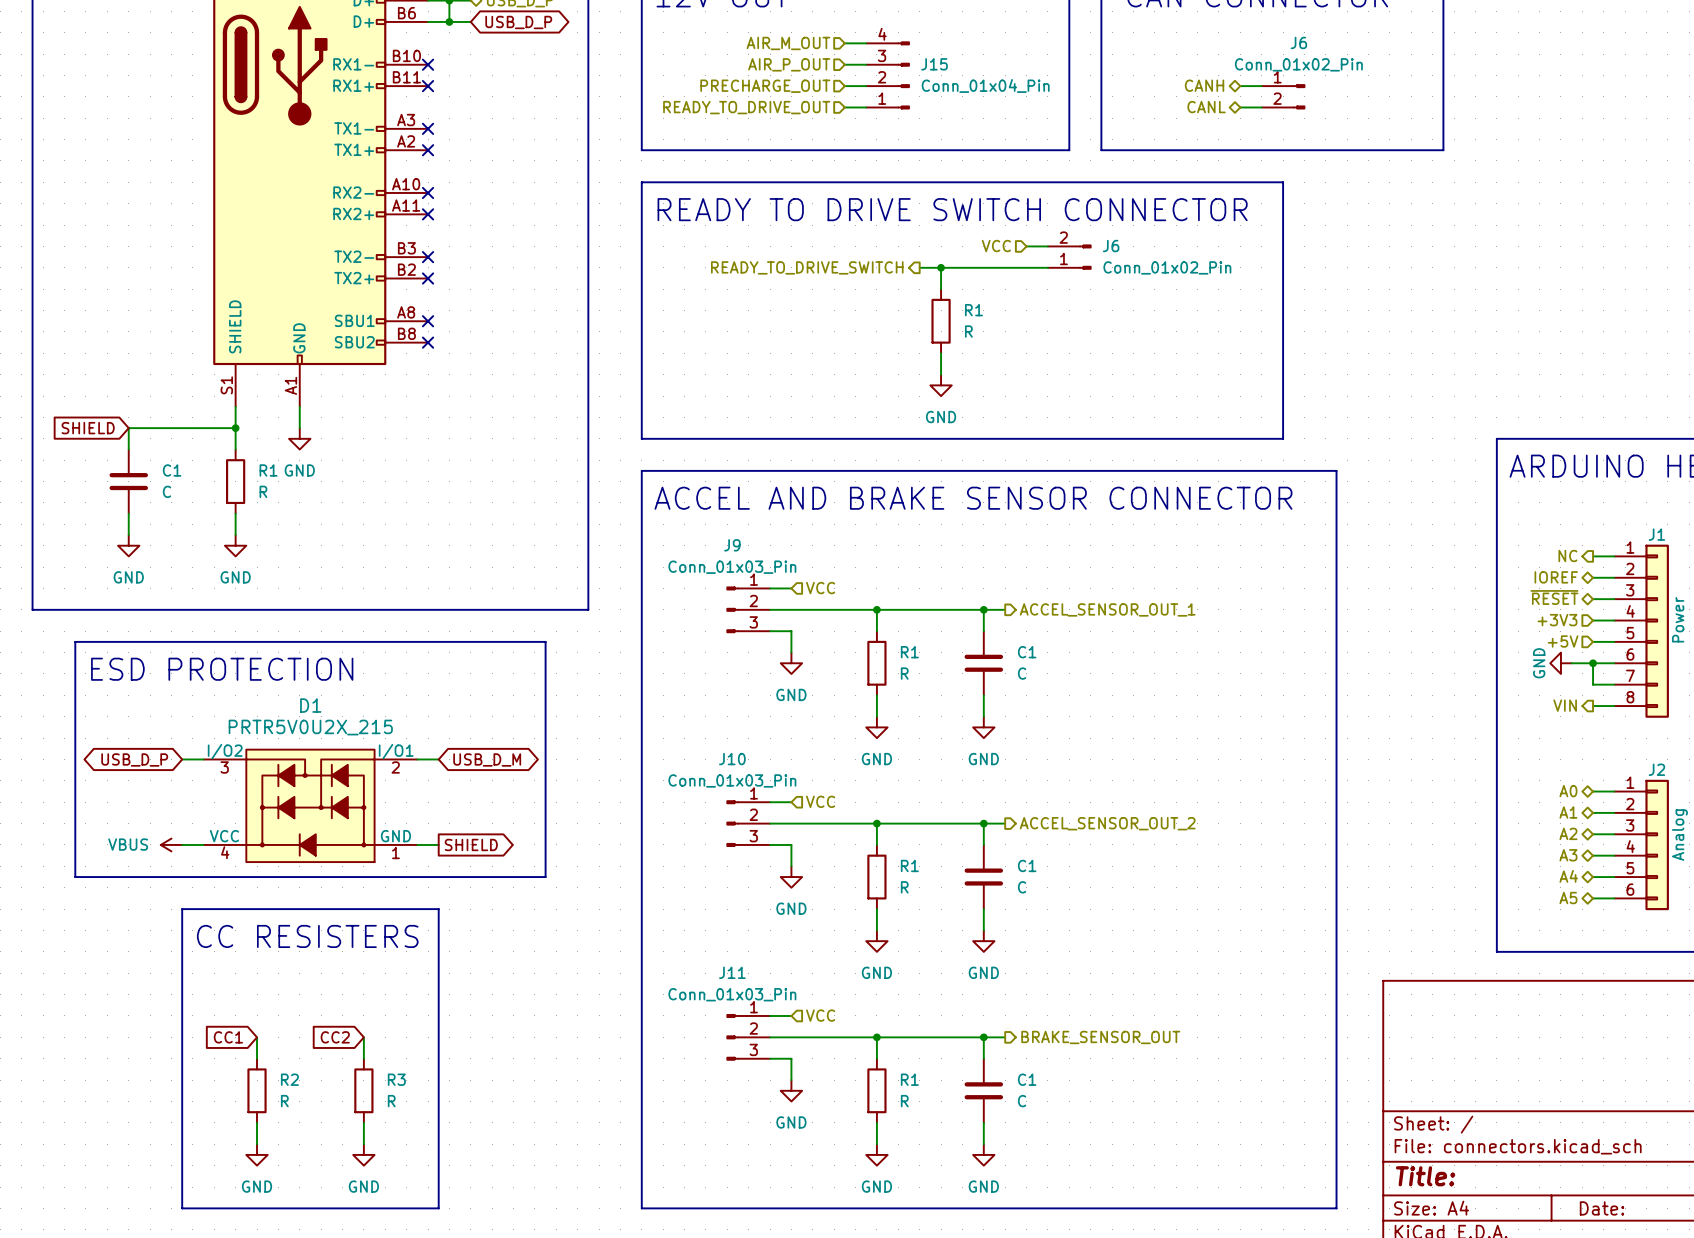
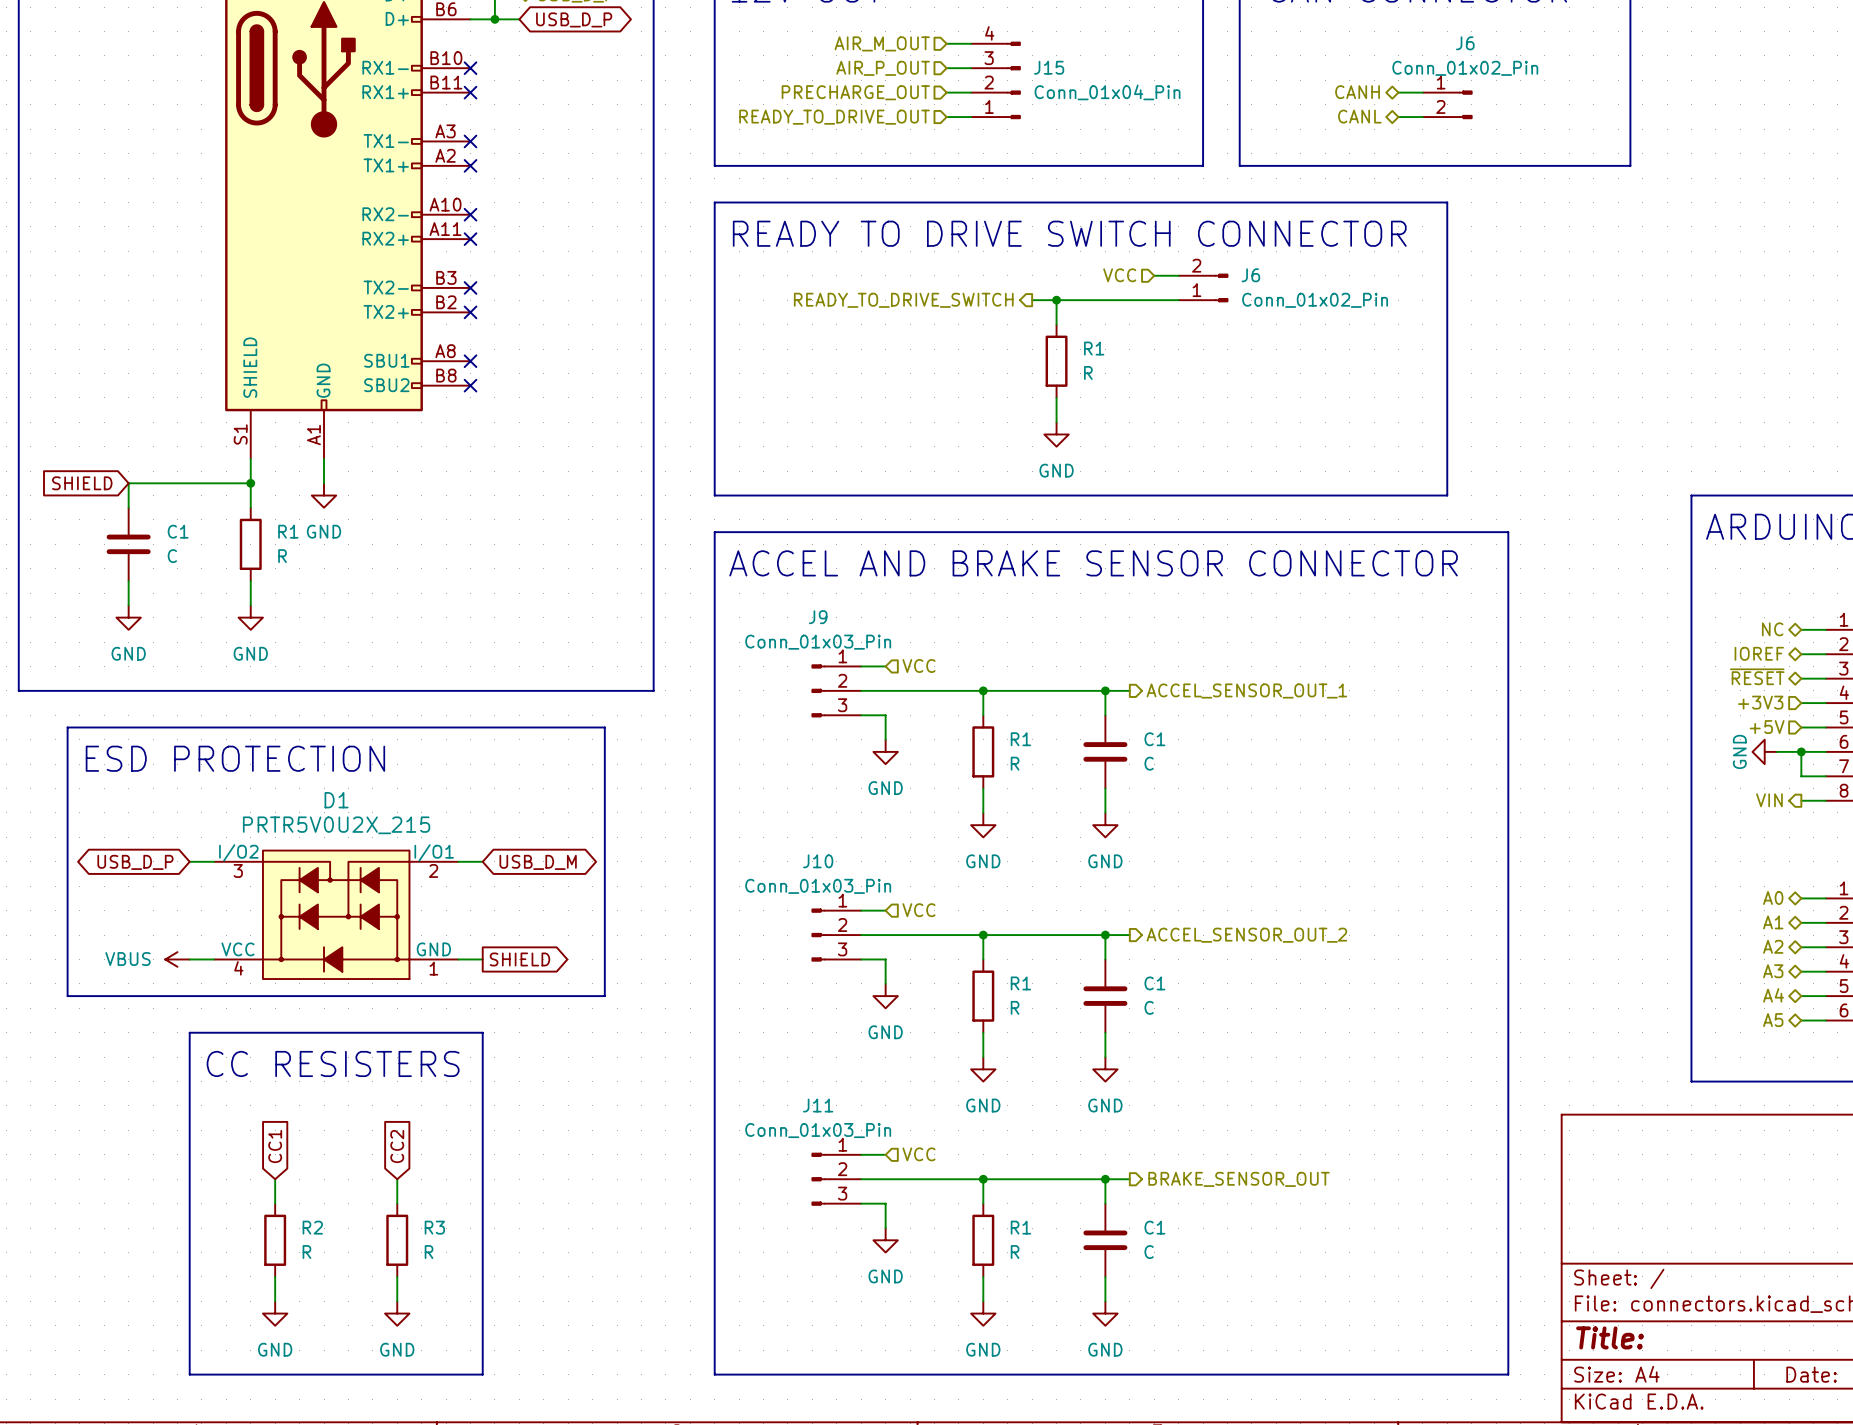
hierarchical label shape: output (1567, 555) -> bidirectional (1772, 629)
global label rotation: 0° (228, 1037) -> 90° clockwise (275, 1146)
global label rotation: 0° (335, 1037) -> 90° clockwise (397, 1146)

